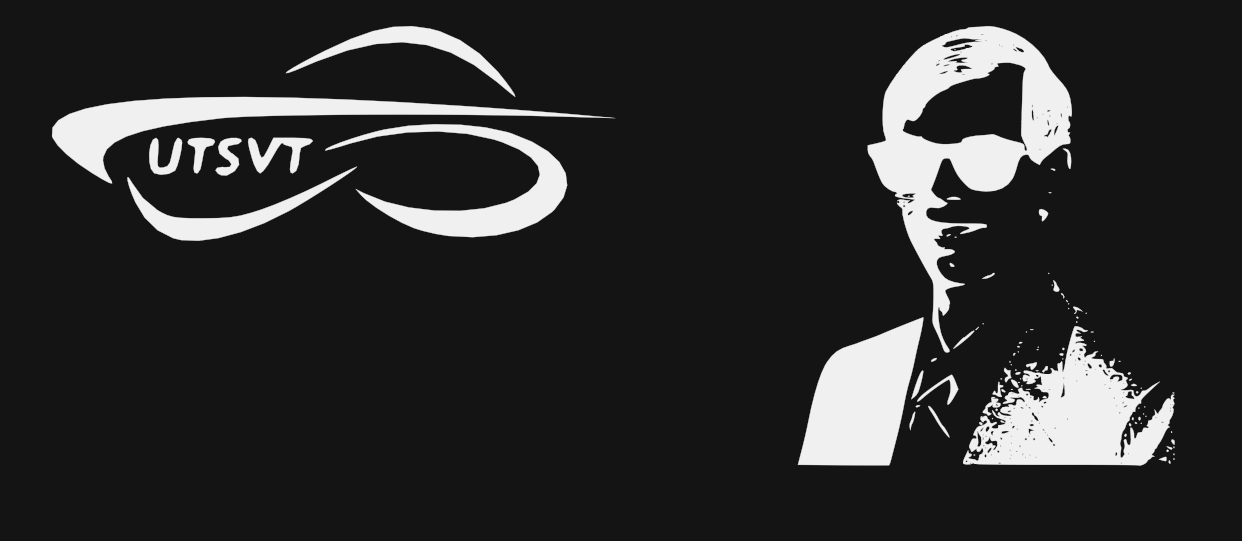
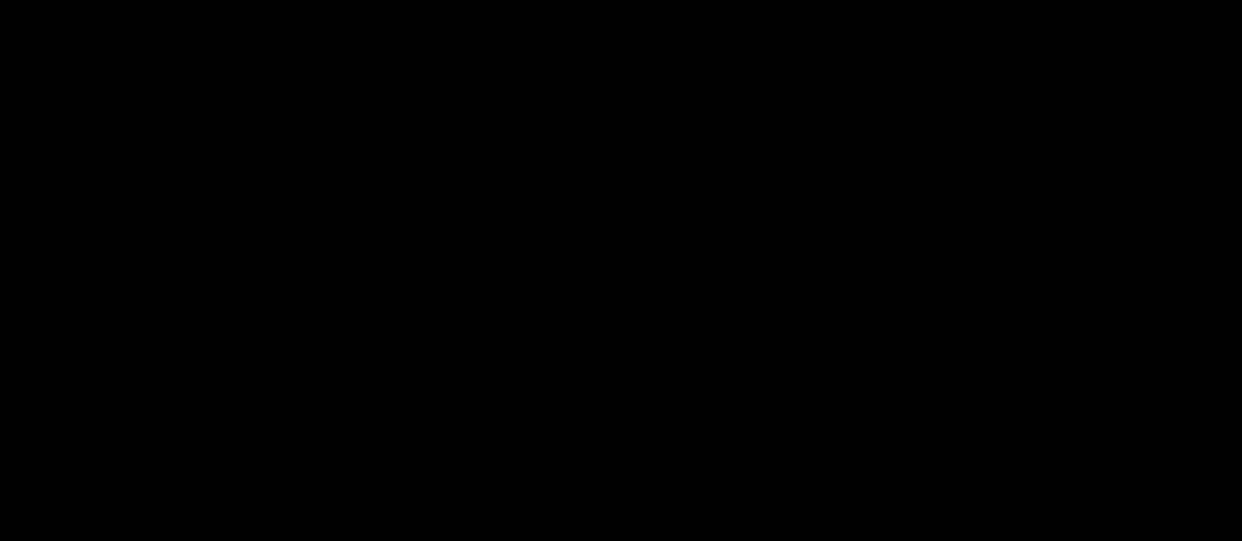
drawing: [51, 25, 616, 241] -> none
drawing: [797, 25, 1175, 466] -> none

